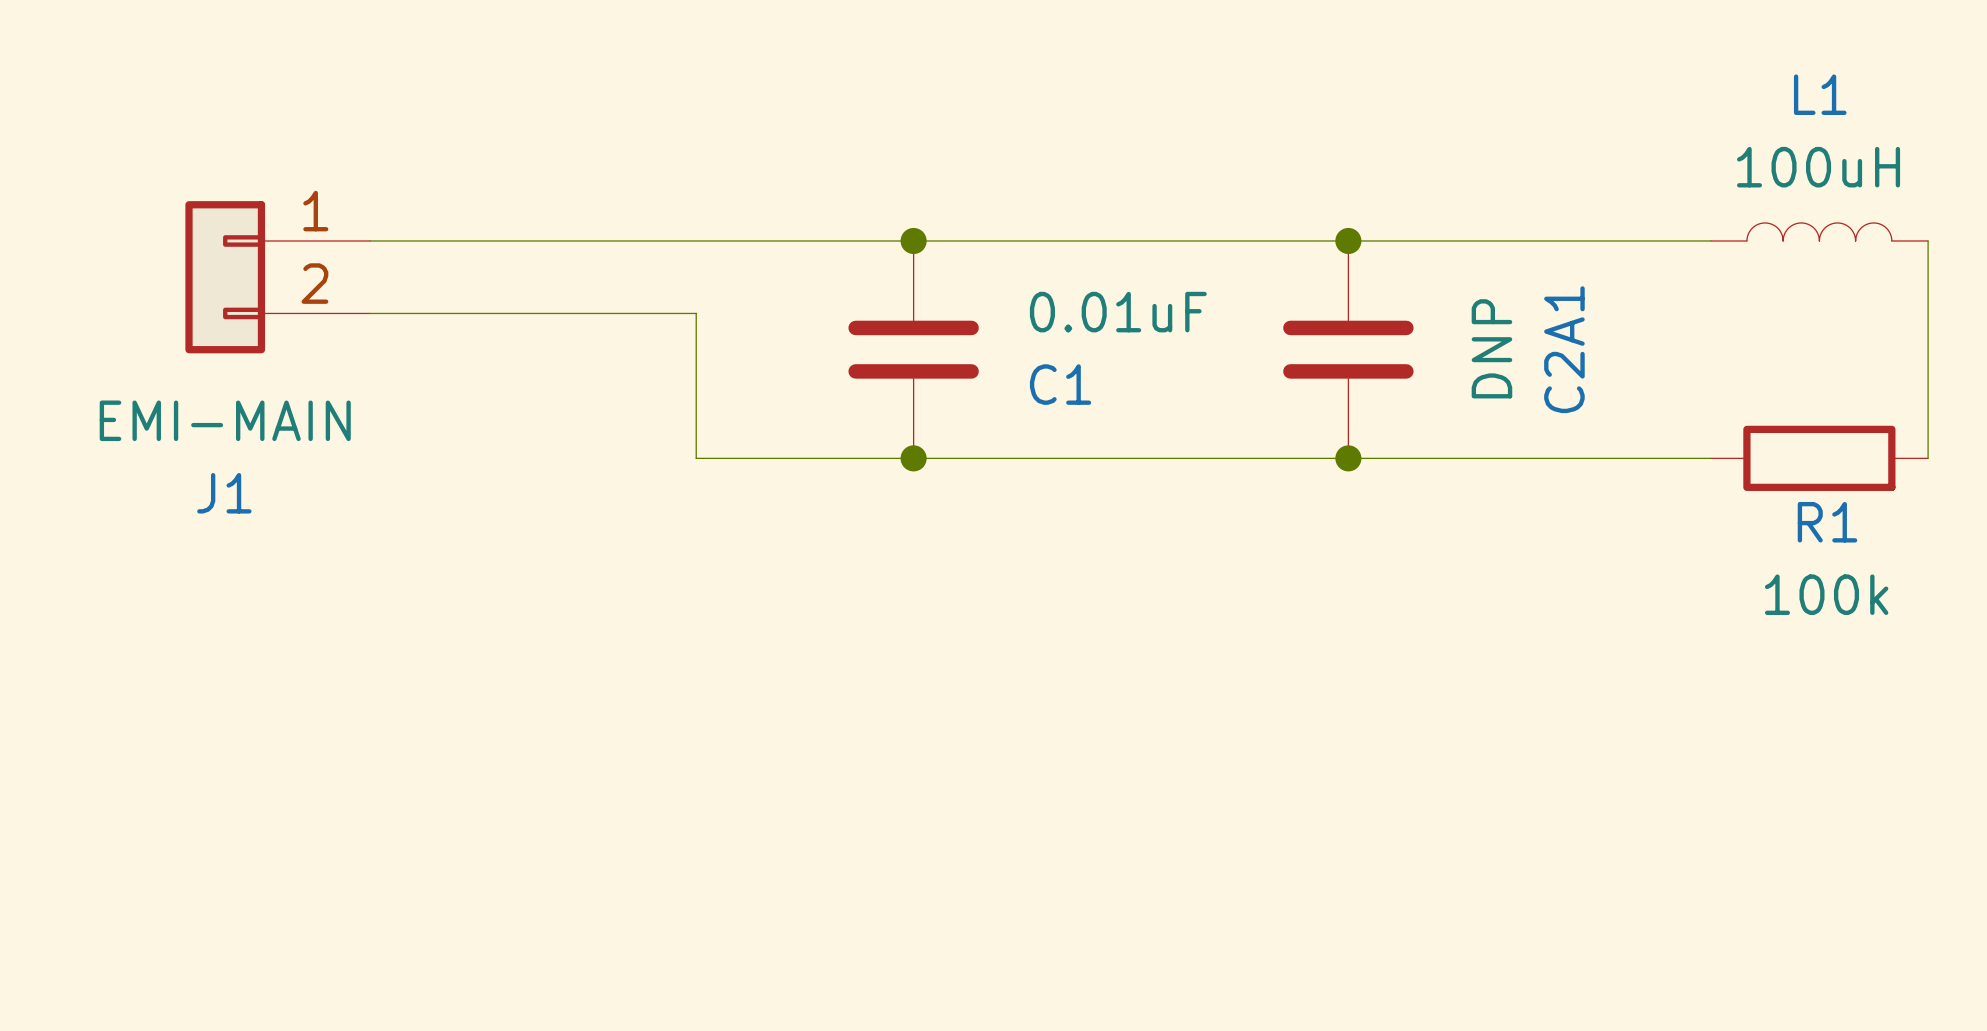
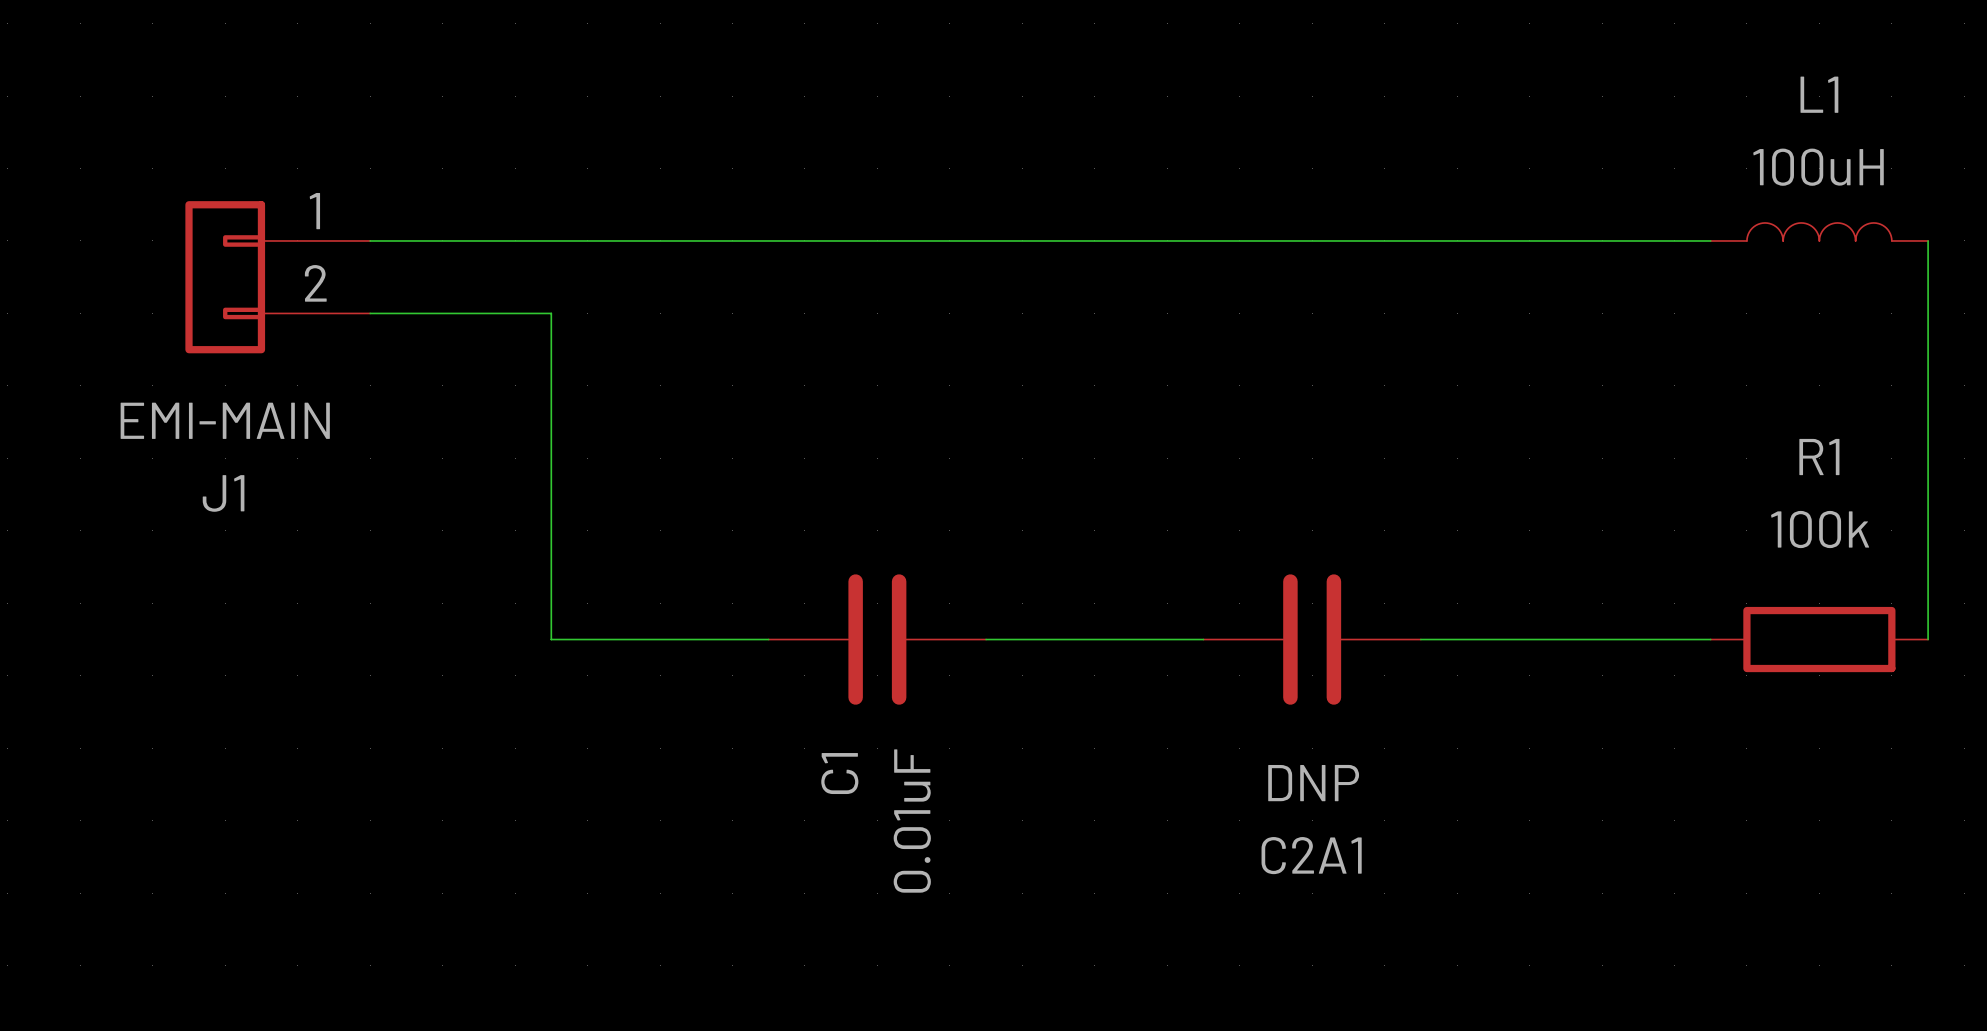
junction: (913, 240) -> none
junction: (1348, 240) -> none
wire: (551, 313) (696, 313) (696, 458) (1710, 458) -> (551, 313) (551, 639) (768, 639)
C1 rotation: 0° (913, 349) -> 90° clockwise (877, 639)
C1 position: (913, 349) -> (877, 639)
C2A1 rotation: 0° (1348, 349) -> 90° clockwise (1312, 639)
C2A1 position: (1348, 349) -> (1312, 639)
junction: (913, 458) -> none
junction: (1348, 458) -> none
R1 position: (1819, 458) -> (1819, 639)
wire: none -> (1928, 458) (1928, 639)
R1 name position: R1 (1827, 522) -> R1 (1819, 457)
R1 value position: 100k (1826, 594) -> 100k (1820, 529)
wire: none -> (986, 639) (1203, 639)
wire: none -> (1420, 639) (1710, 639)

